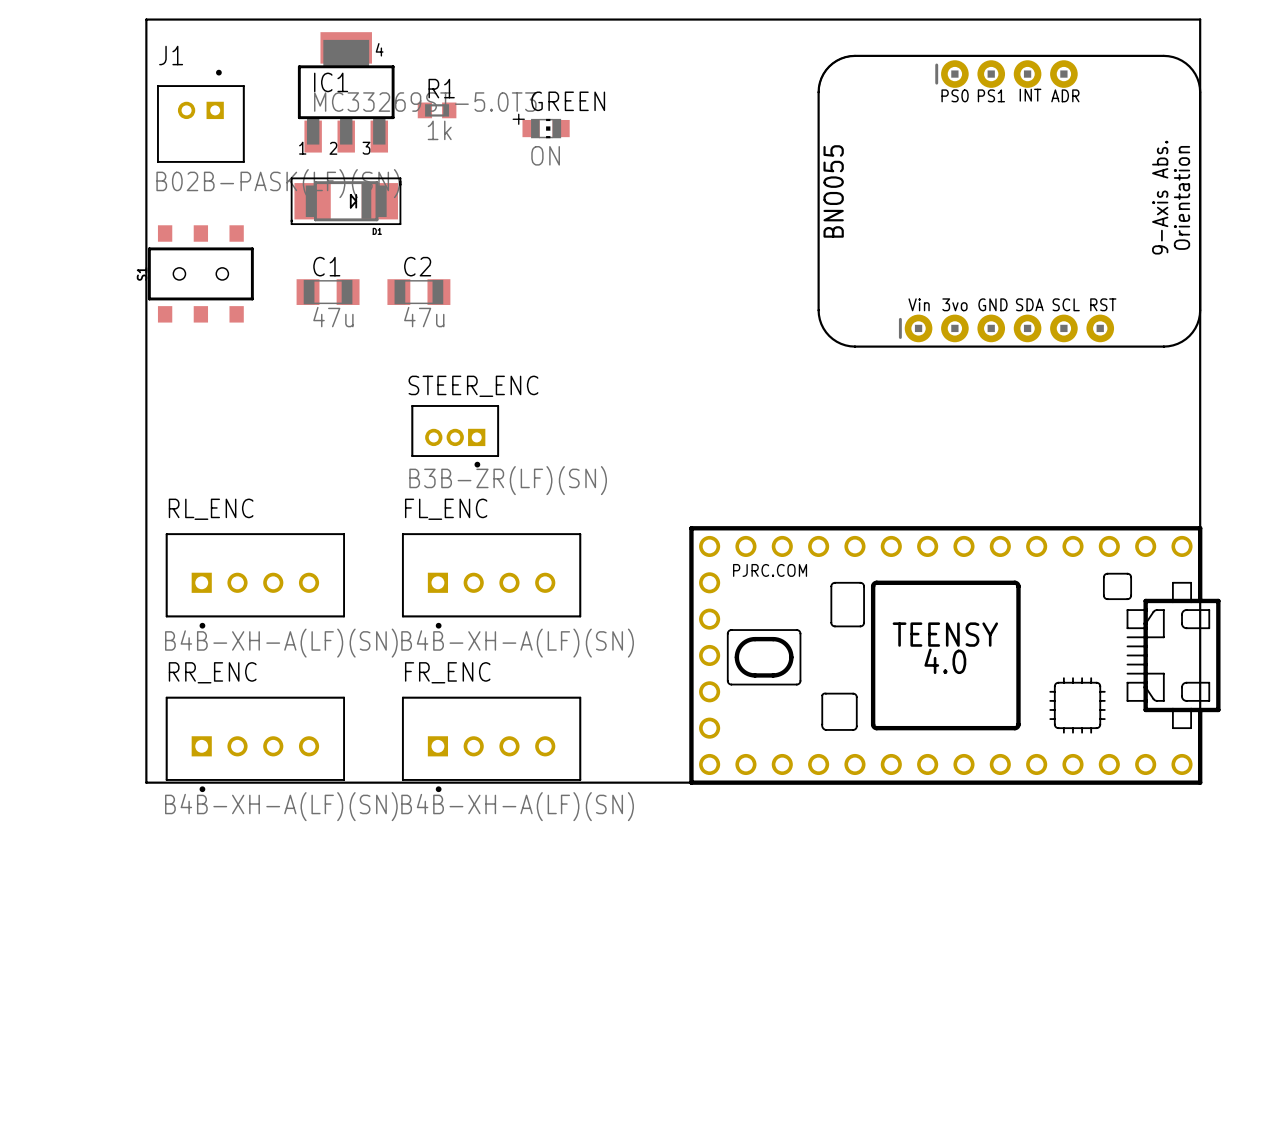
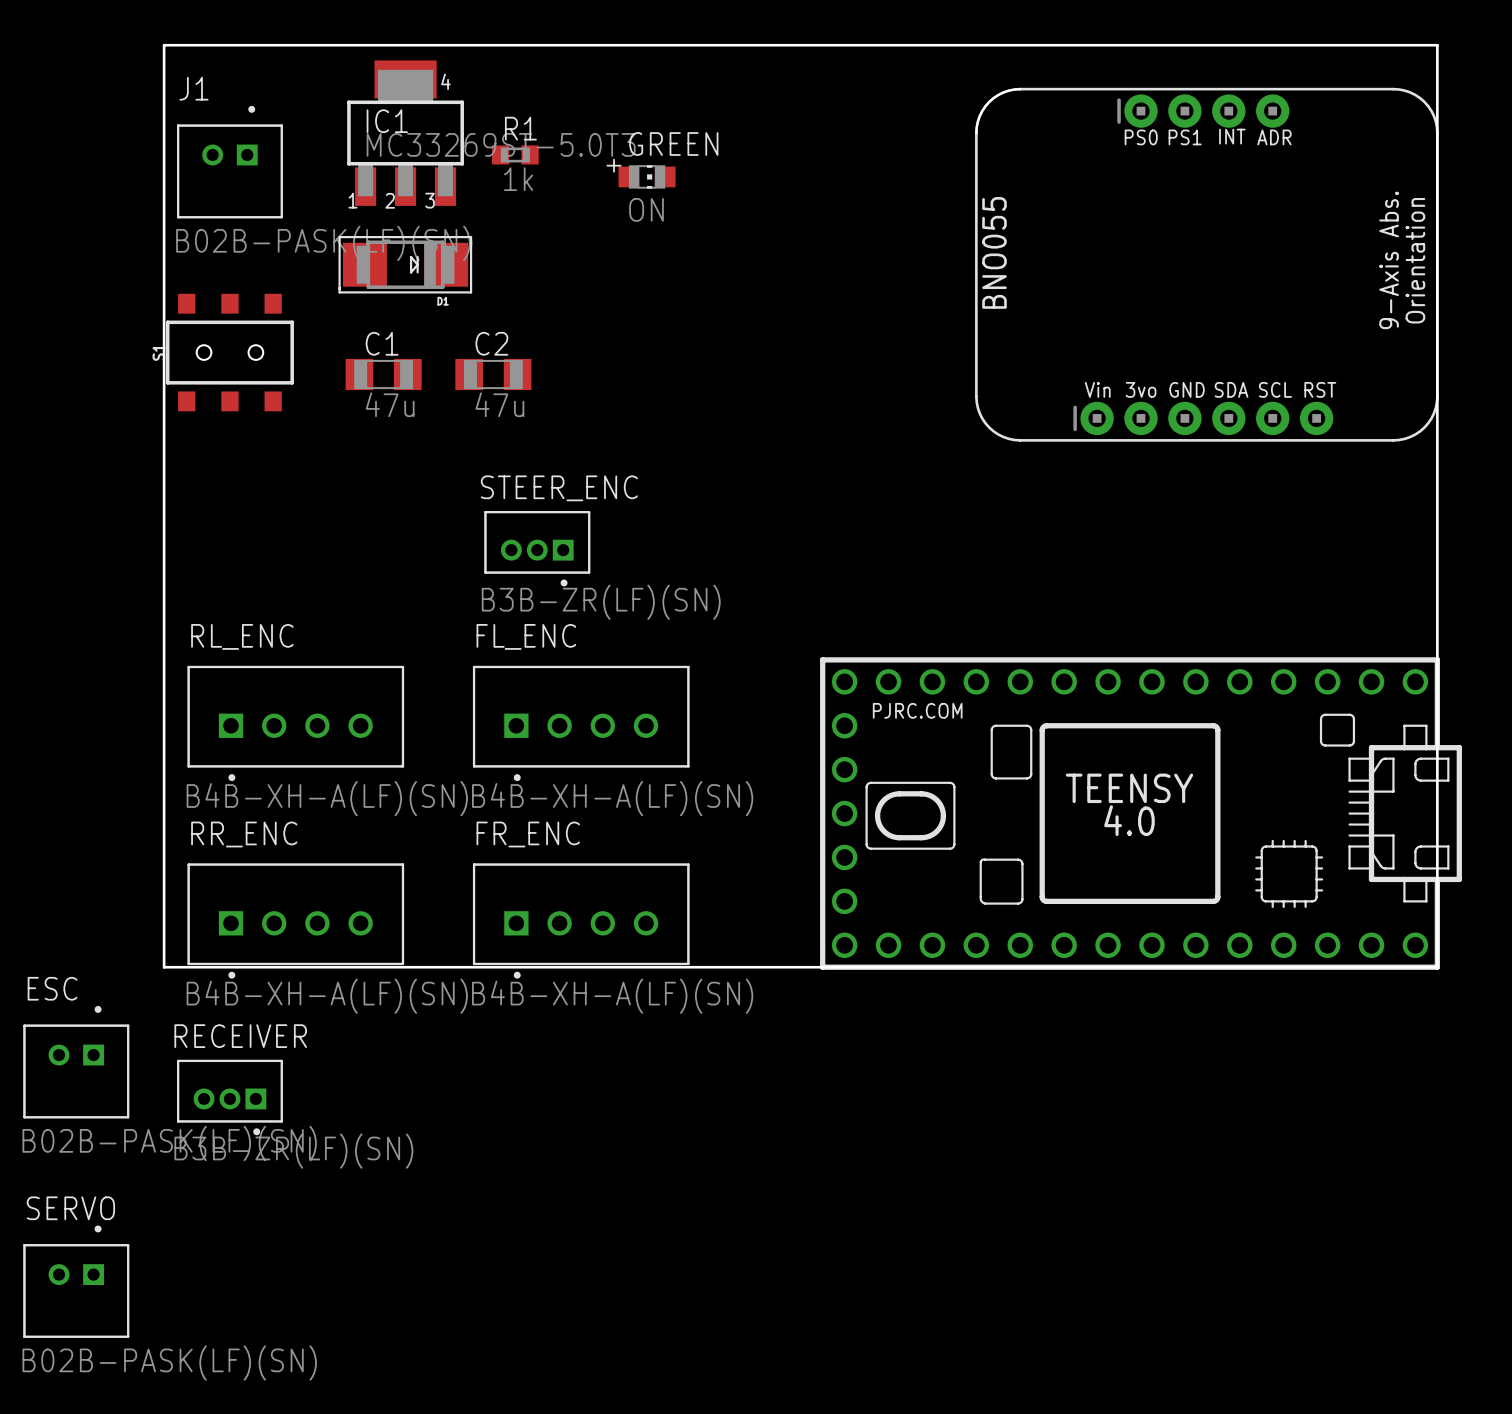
ESC: none -> B02B-PASK(LF)(SN) (76, 1062)
RECEIVER: none -> B3B-ZR(LF)(SN) (229, 1097)
SERVO: none -> B02B-PASK(LF)(SN) (76, 1281)

